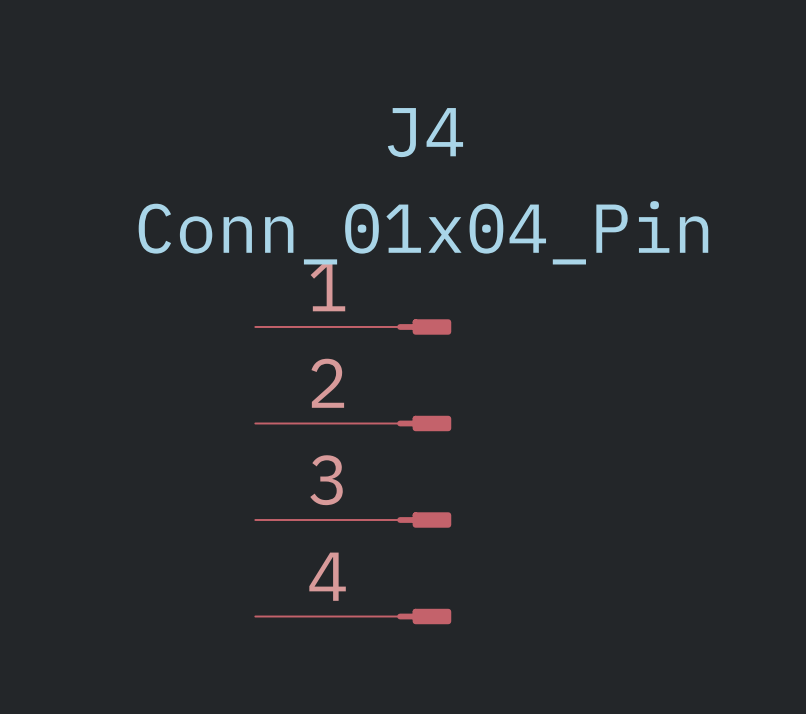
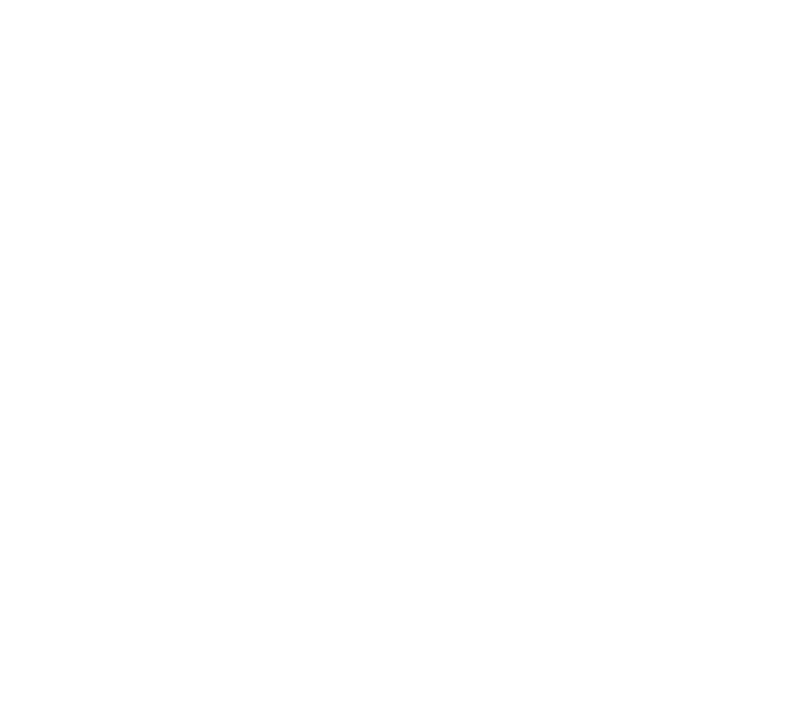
J4: Conn_01x04_Pin (353, 471) -> none

